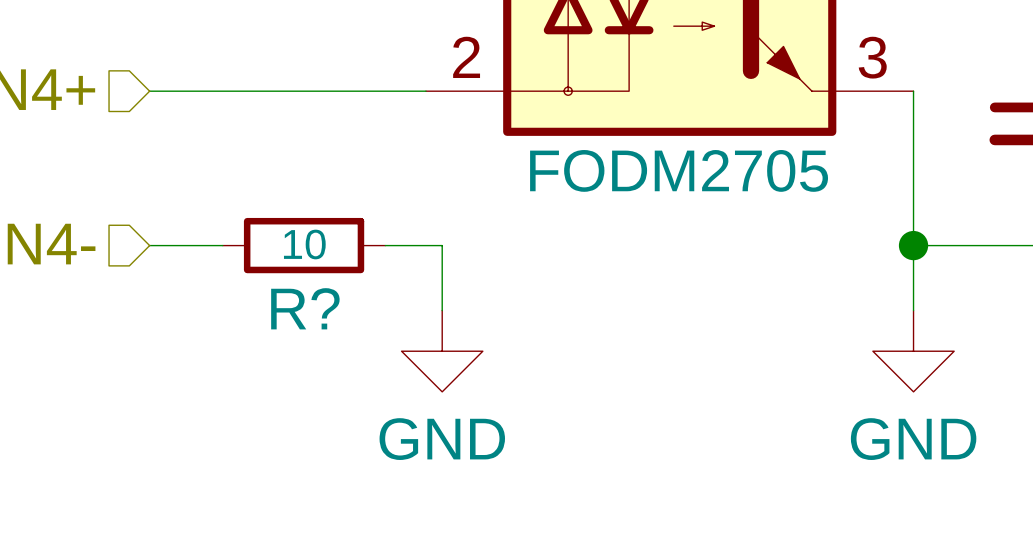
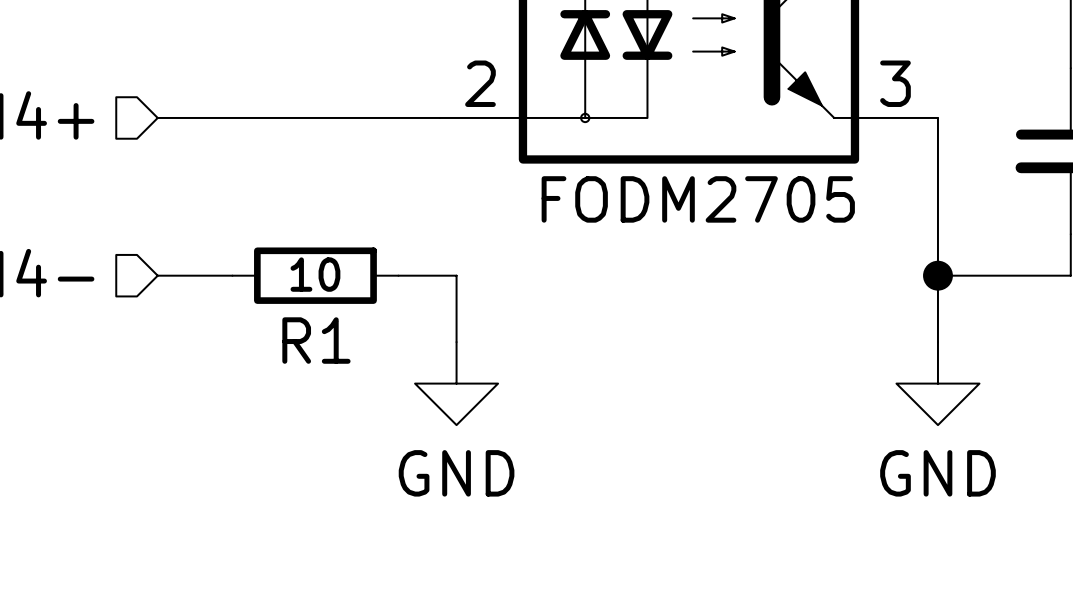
R? name: R? (305, 308) -> R1 (316, 340)

